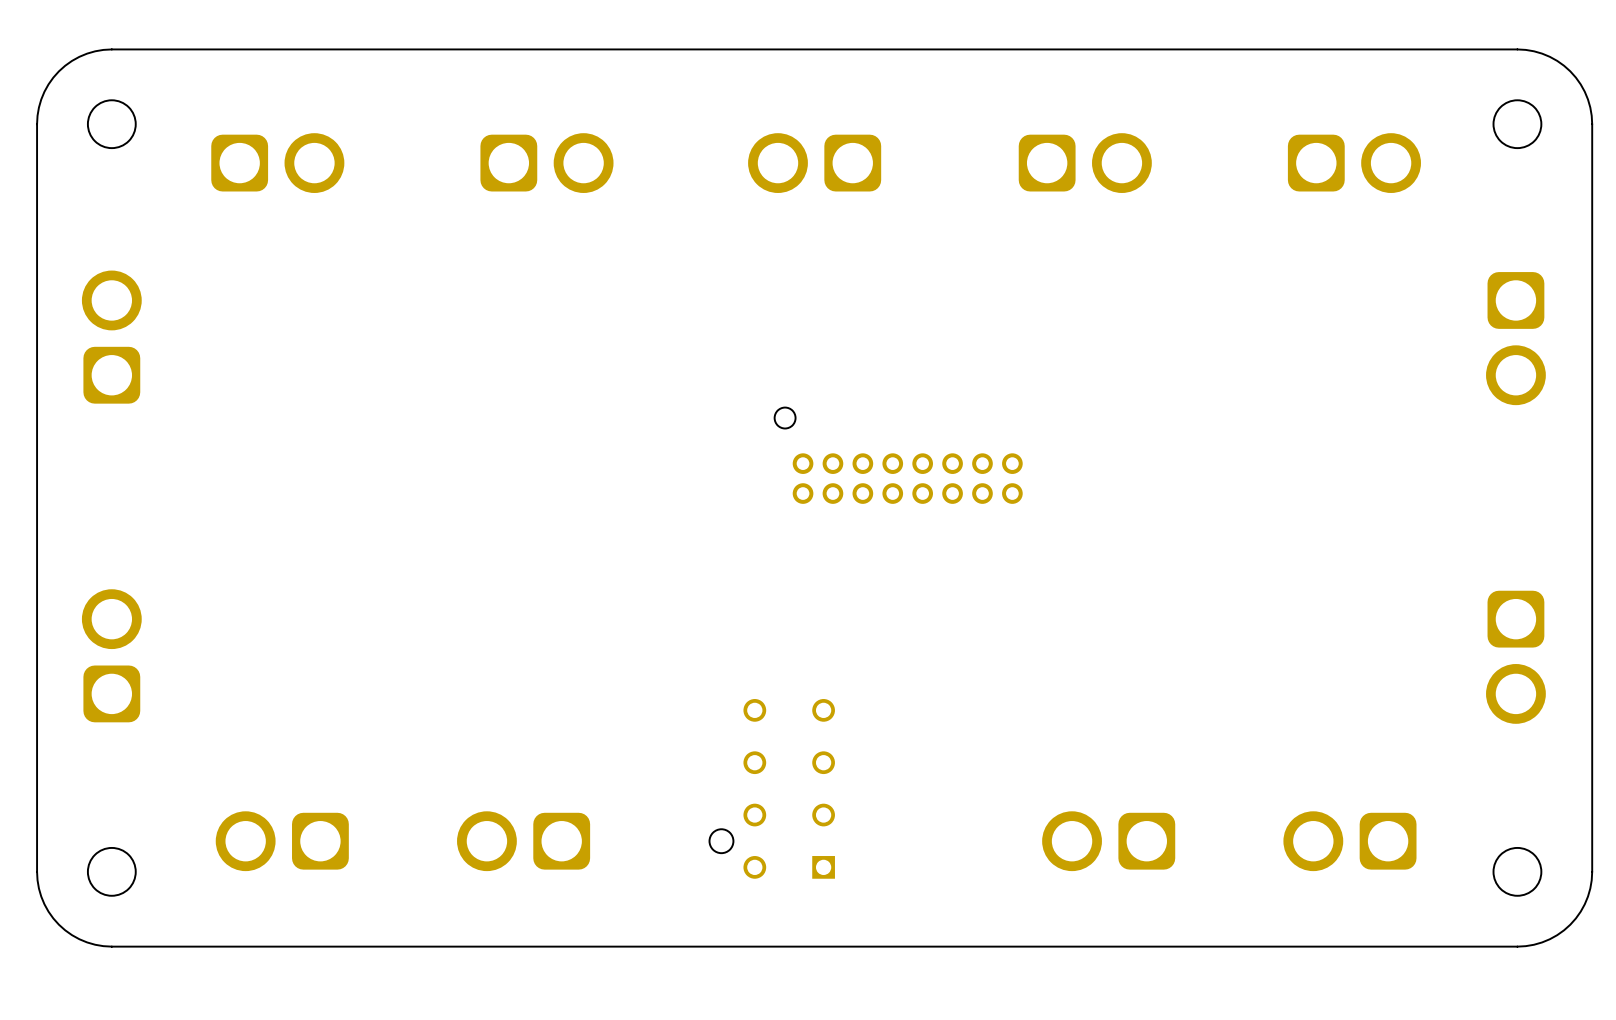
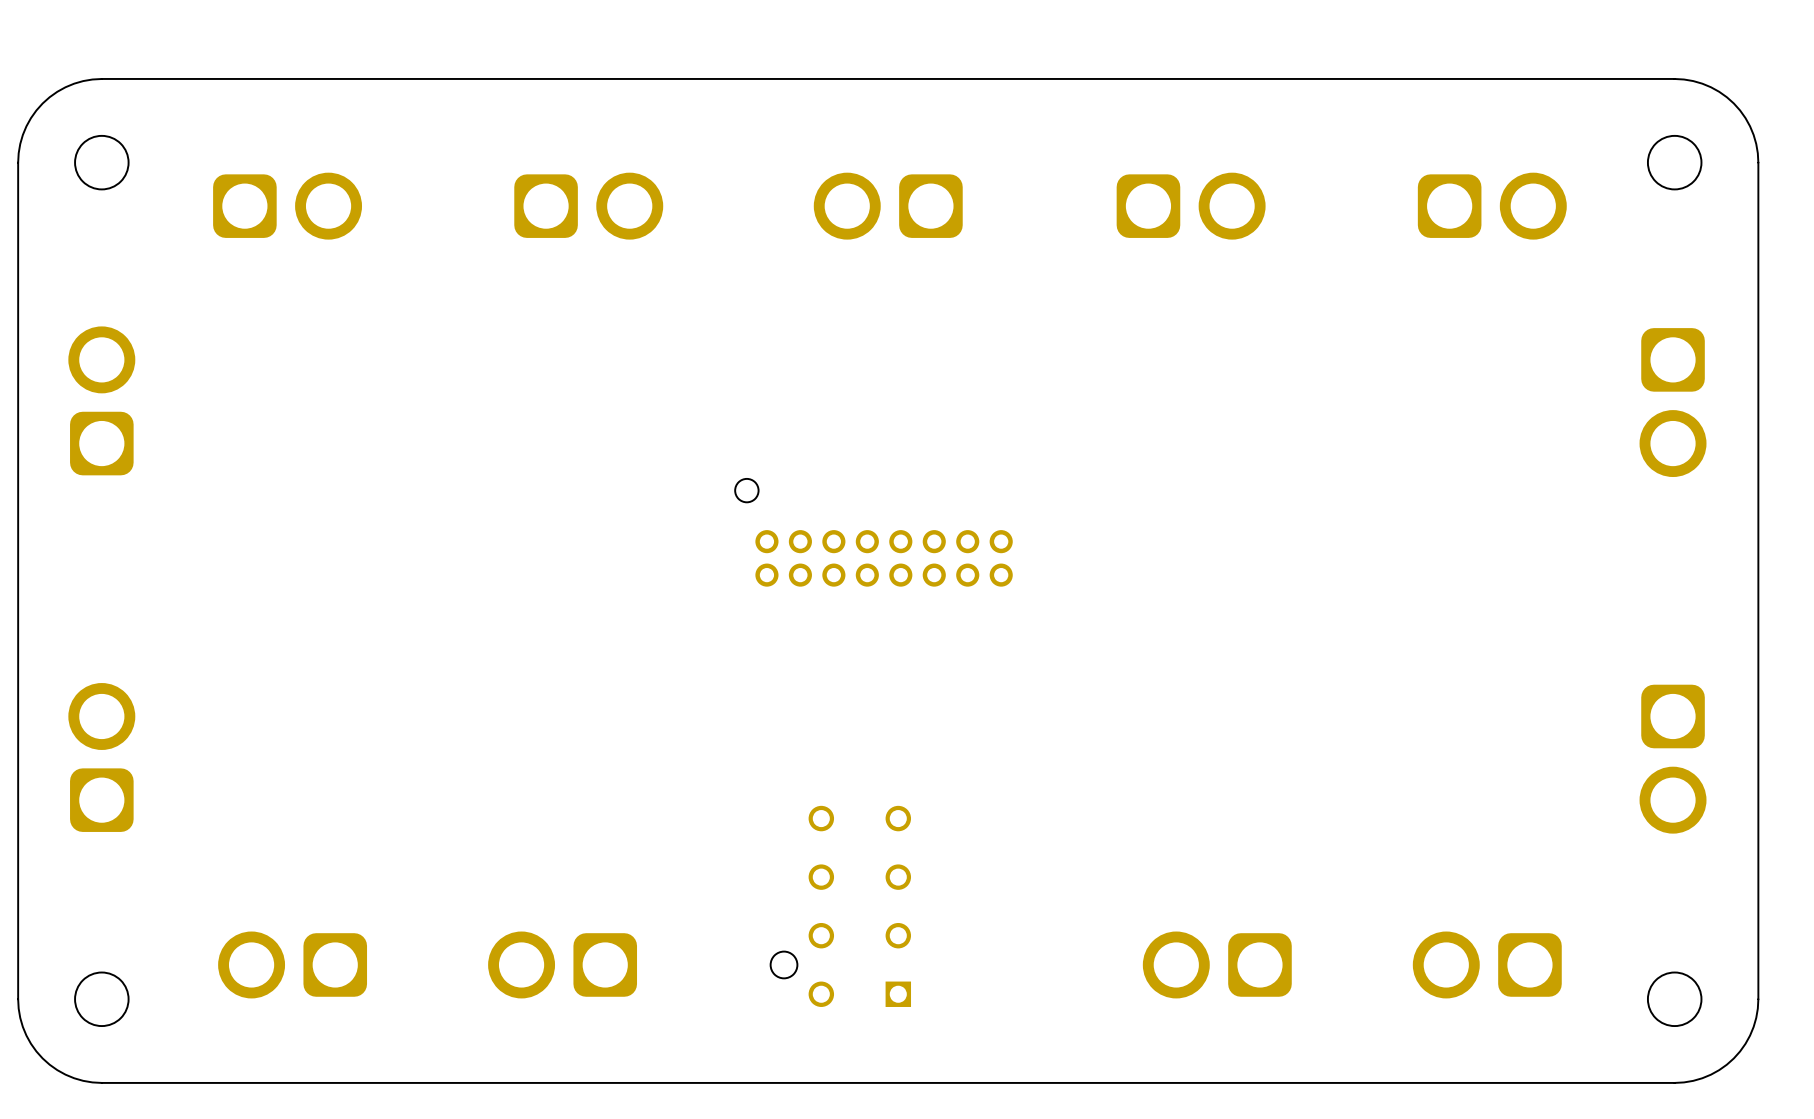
part position: (898, 455) -> (873, 532)

